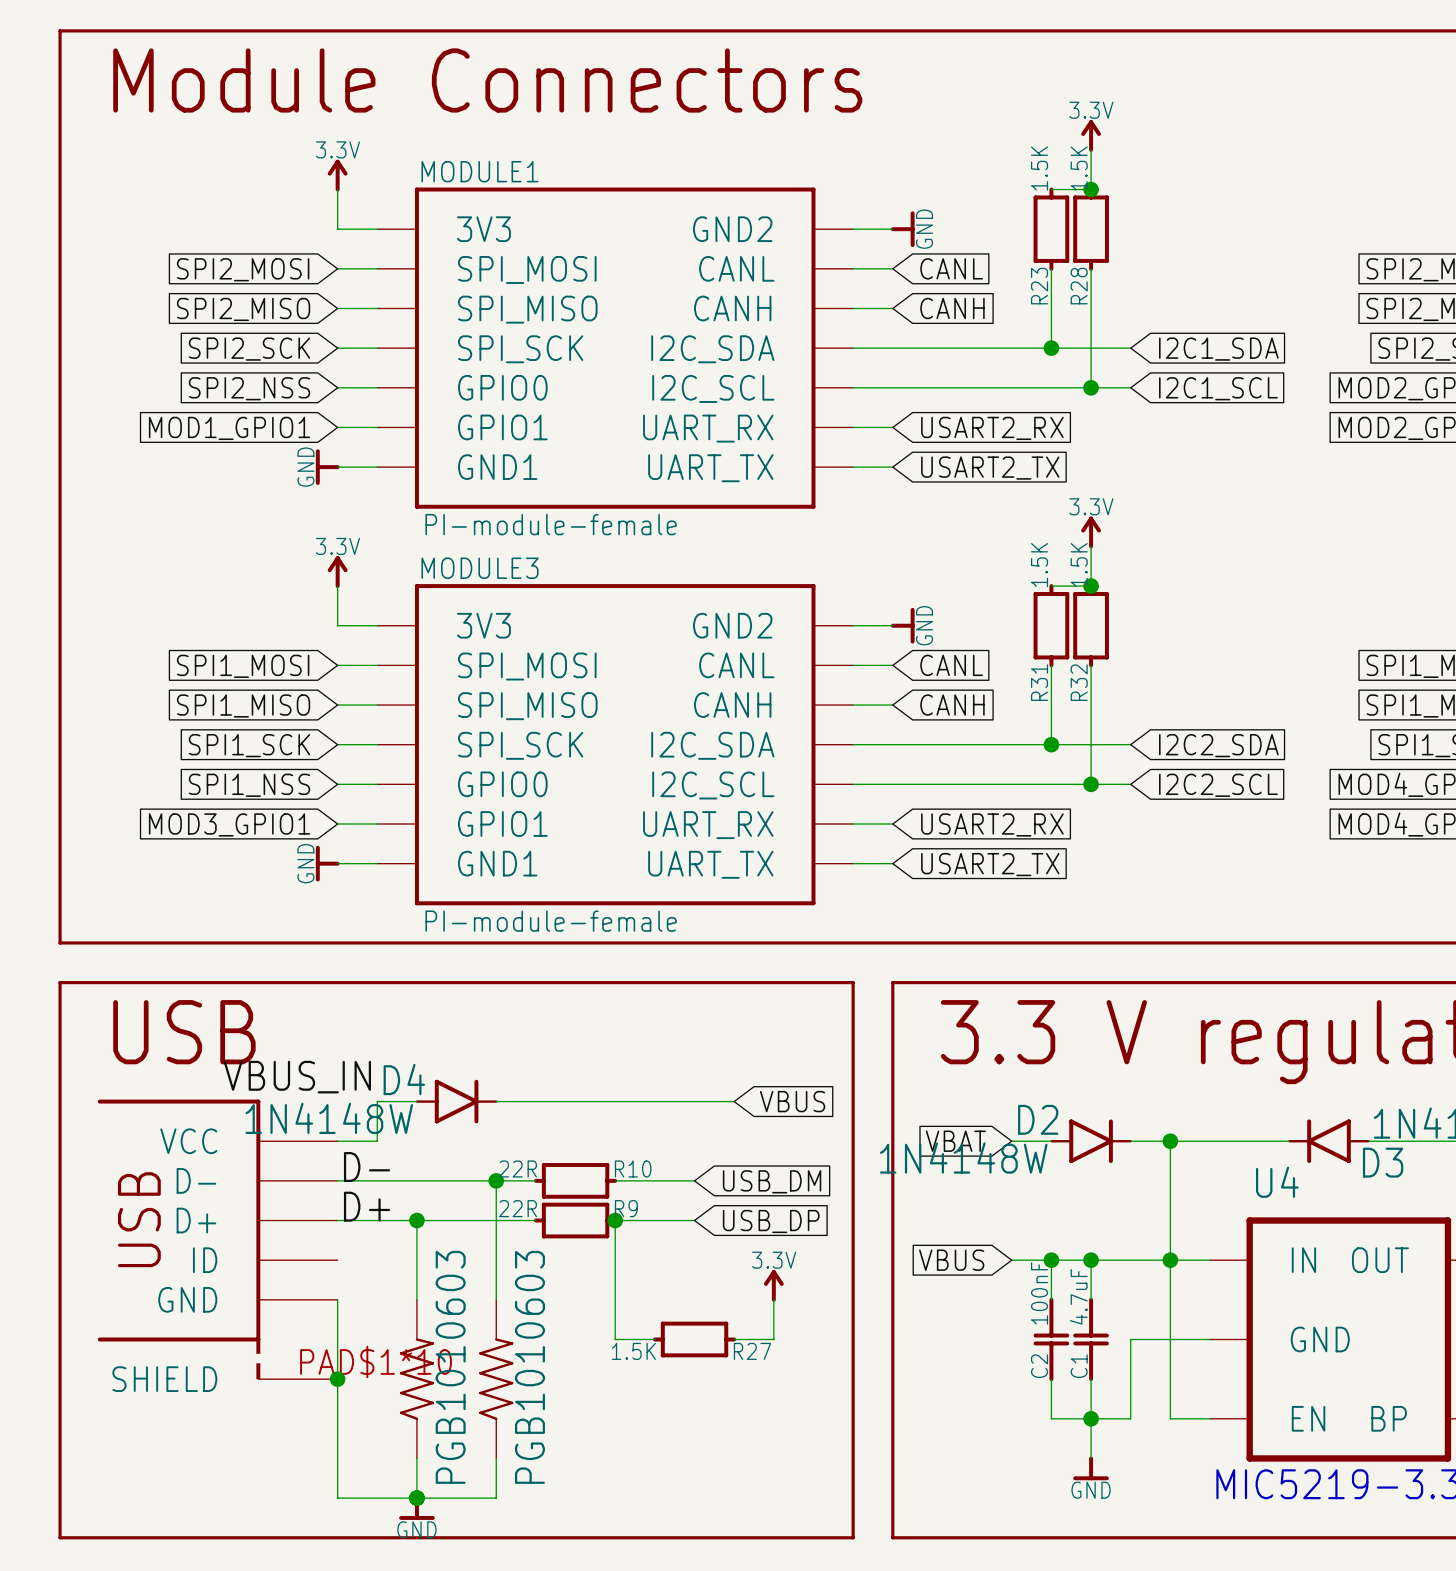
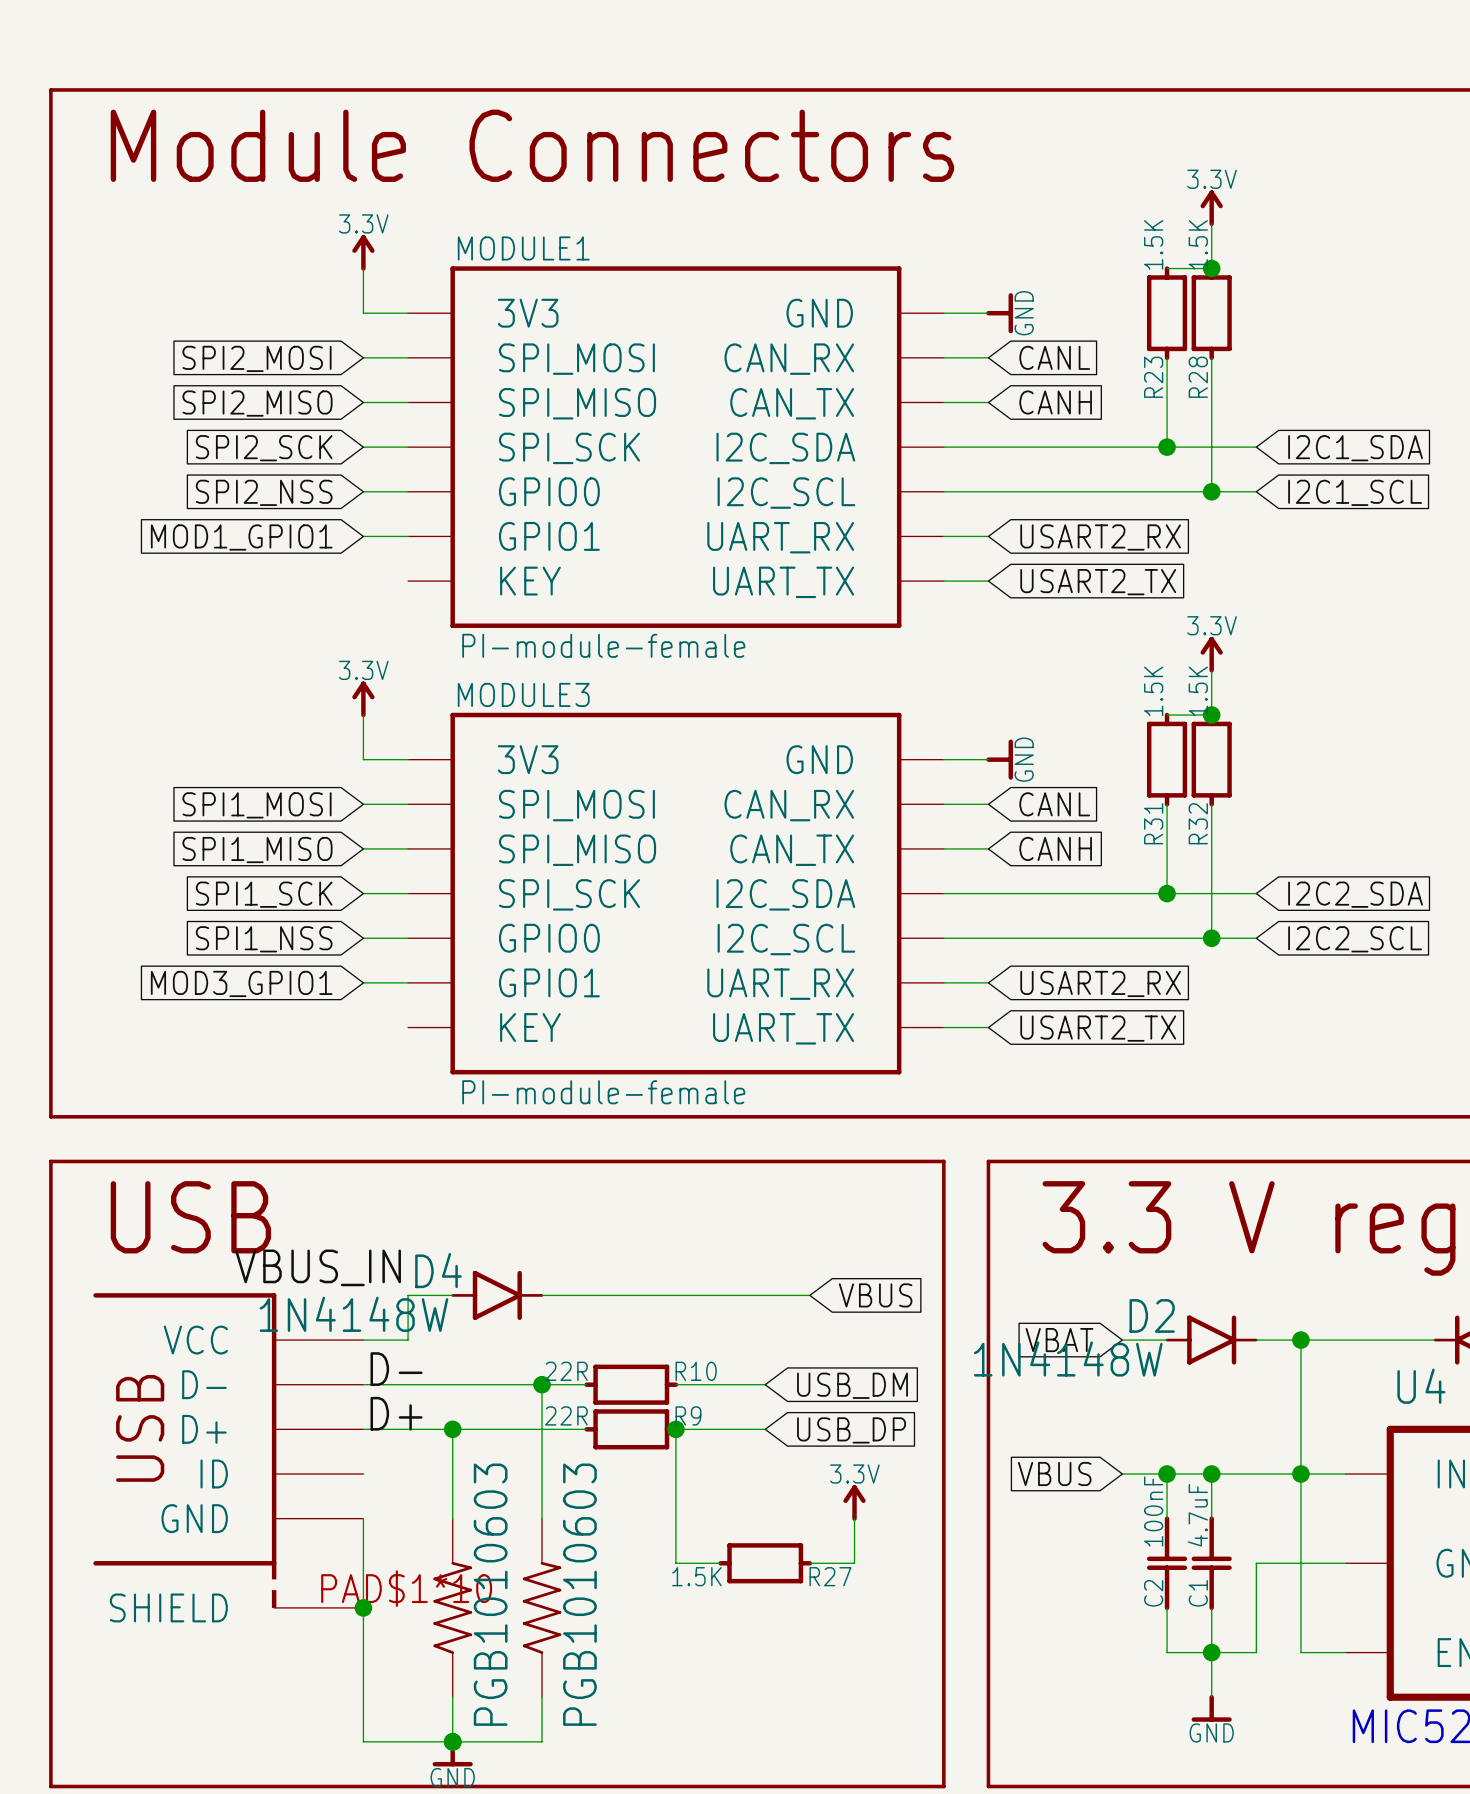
MODULE1 pin name: GND2 (732, 229) -> GND (819, 313)
MODULE1 pin name: CANL (736, 268) -> CAN_RX (789, 359)
MODULE1 pin name: CANH (732, 308) -> CAN_TX (792, 403)
power symbol: GND (327, 467) -> none
wire: (337, 467) (377, 467) -> none
MODULE1 pin name: GND1 (497, 467) -> KEY (530, 581)
MODULE3 pin name: GND2 (732, 625) -> GND (819, 759)
MODULE3 pin name: CANL (736, 665) -> CAN_RX (789, 805)
MODULE3 pin name: CANH (732, 705) -> CAN_TX (792, 850)
power symbol: GND (327, 863) -> none
wire: (337, 863) (377, 863) -> none
MODULE3 pin name: GND1 (497, 863) -> KEY (530, 1027)

